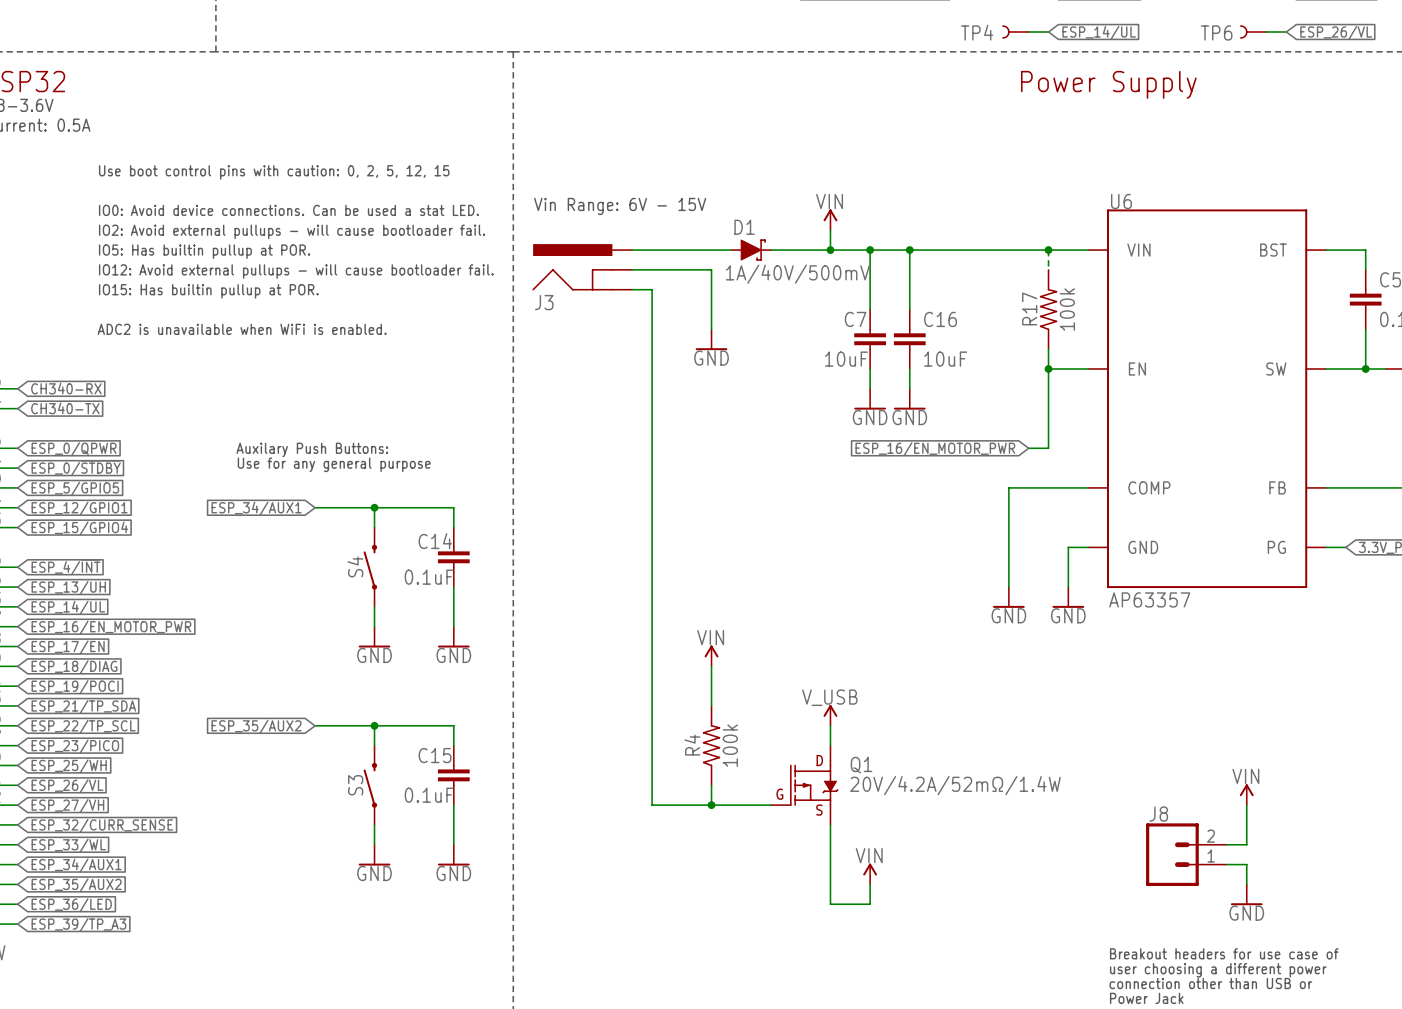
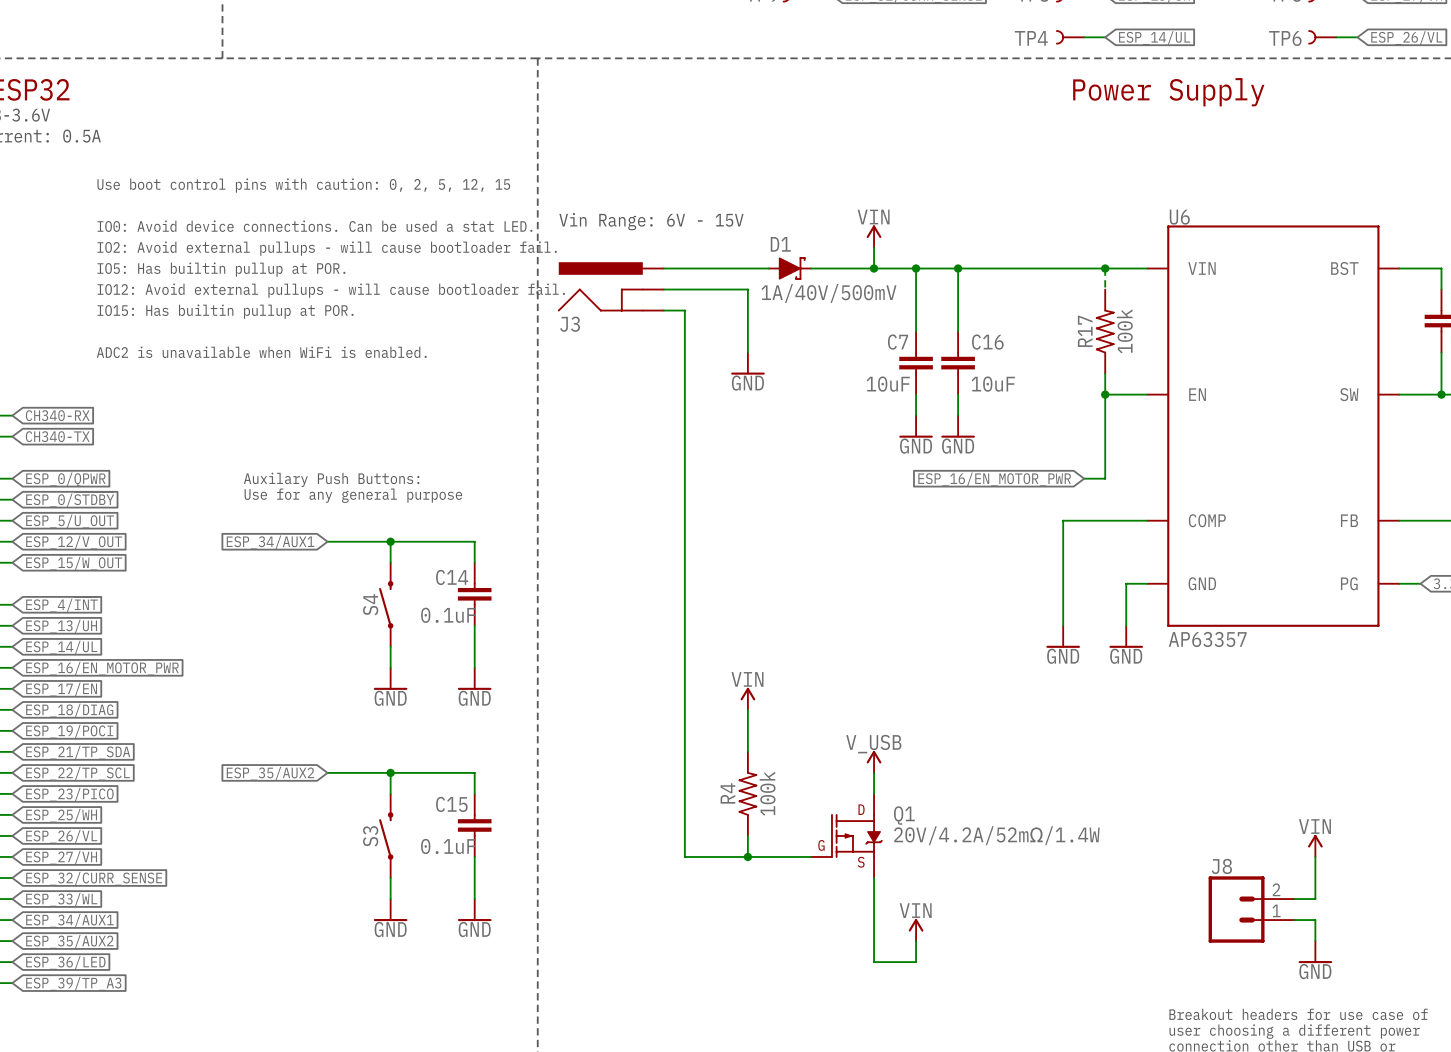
global label: ESP_5/GPIO5 (75, 488) -> ESP_5/U_OUT (70, 521)
global label: ESP_12/GPIO1 (79, 508) -> ESP_12/V_OUT (74, 542)
global label: ESP_15/GPIO4 (79, 528) -> ESP_15/W_OUT (74, 563)

